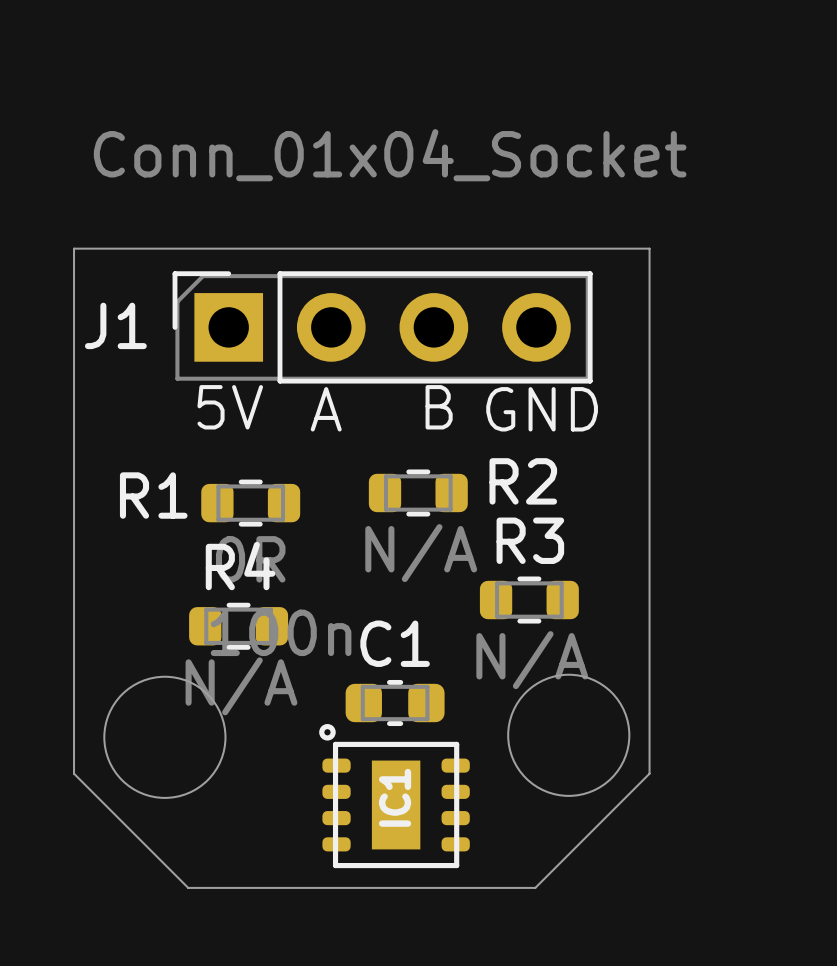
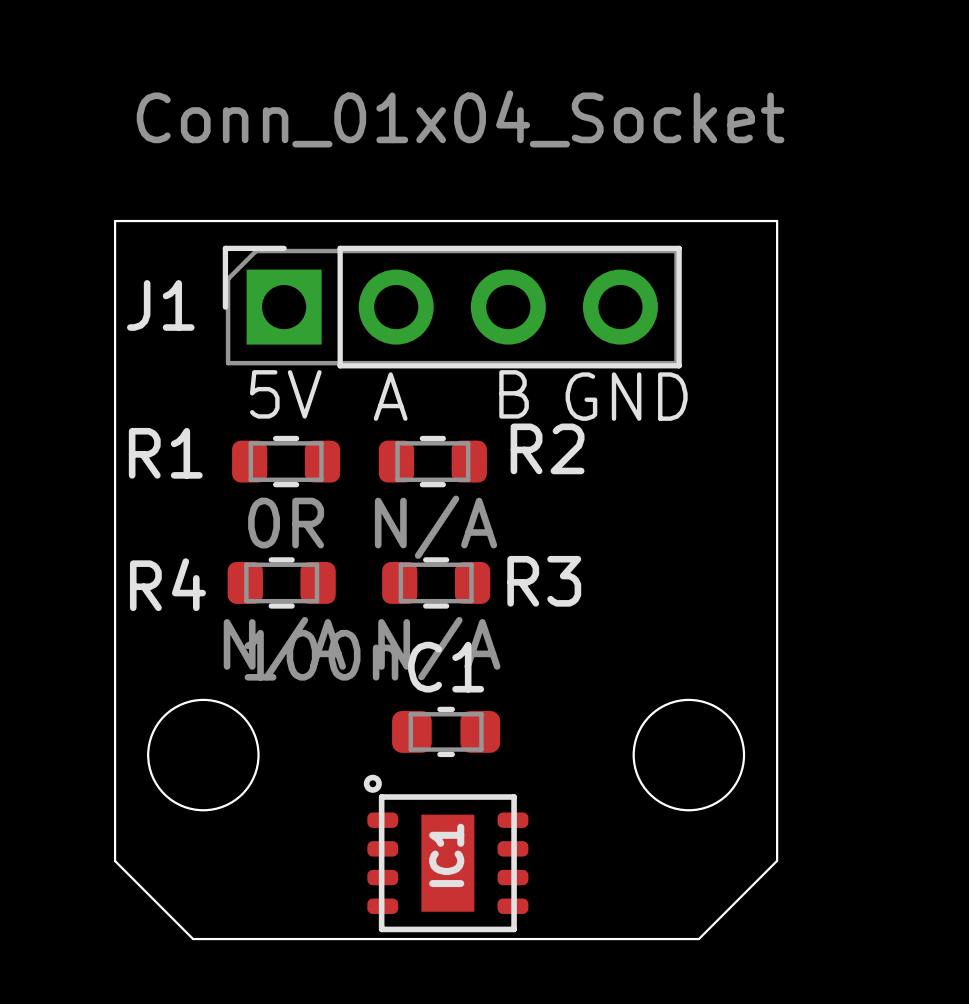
board edge: (649, 248) (649, 773) (535, 887) (188, 887) (74, 773) -> (744, 221) (777, 221) (777, 861) (698, 939) (193, 939) (115, 861) (115, 794)
R2 position: (418, 492) -> (432, 461)
R1 name position: R1 (153, 495) -> R1 (165, 453)
R1 position: (250, 503) -> (286, 461)
R3 name position: R3 (530, 540) -> R3 (544, 581)
R4 name position: R4 (240, 566) -> R4 (167, 584)
R3 position: (529, 600) -> (436, 582)
R4 position: (238, 626) -> (281, 582)
round board edge size: [507, 673, 631, 797] -> [632, 698, 746, 812]
round board edge size: [103, 675, 227, 799] -> [147, 698, 260, 812]
C1 position: (395, 703) -> (446, 731)
IC1 position: (394, 796) -> (446, 853)

